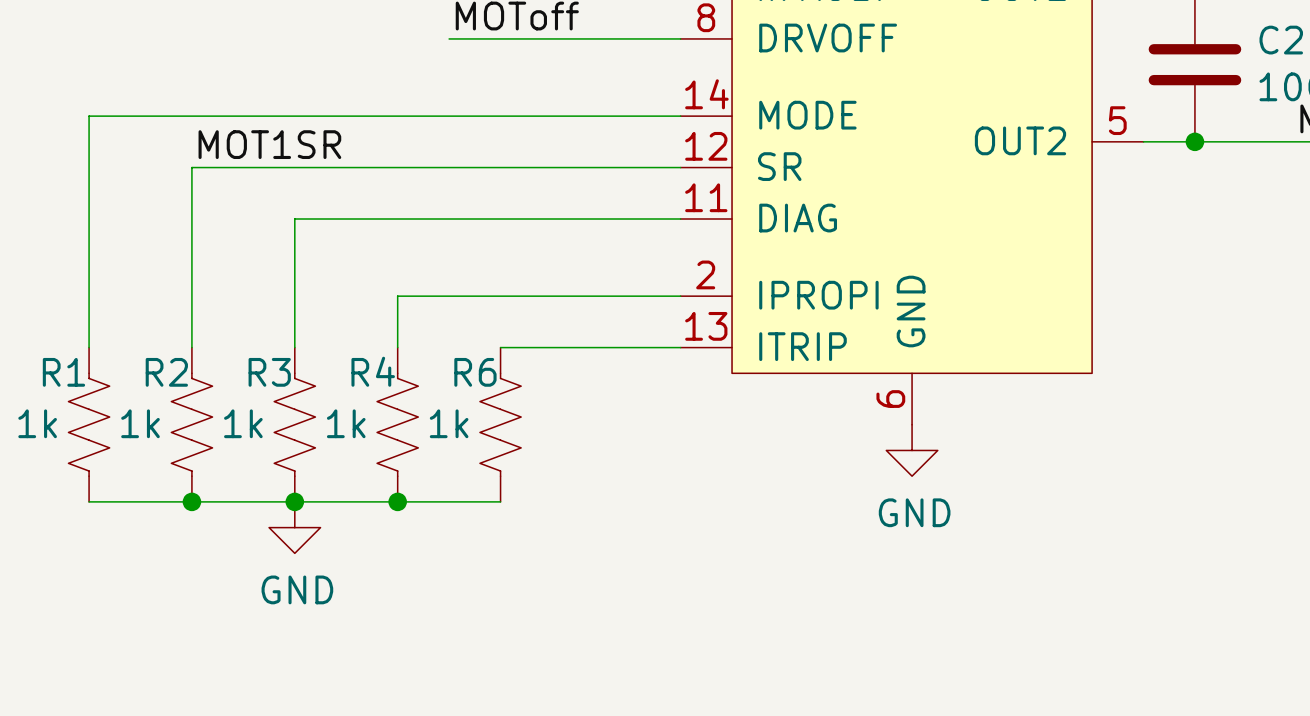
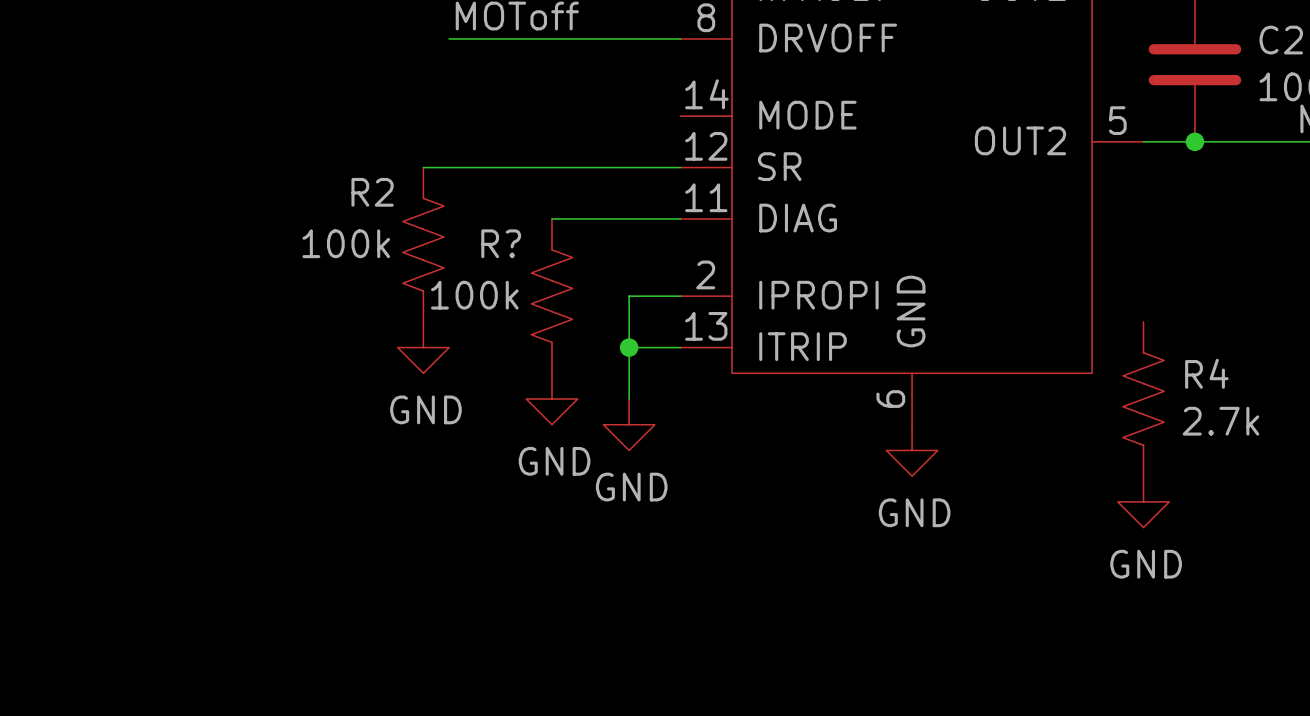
wire: (680, 116) (89, 116) (89, 347) -> none
label: MOT1SR (269, 144) -> none
wire: (423, 167) (191, 167) (191, 347) -> none
wire: (551, 219) (294, 219) (294, 347) -> none
R?: none -> 100k (551, 296)
wire: (629, 296) (397, 296) (397, 347) -> (629, 296) (629, 399)
power symbol: none -> GND (423, 347)
wire: (500, 347) (629, 347) -> none
junction: none -> (629, 347)
R4 name position: R4 (373, 371) -> R4 (1206, 373)
R2 name position: R2 (166, 372) -> R2 (372, 192)
power symbol: none -> GND (551, 399)
R2 value: 1k (140, 423) -> 100k (346, 243)
R4 value: 1k (346, 423) -> 2.7k (1220, 421)
R1: 1k (89, 424) -> none
R2 position: (191, 424) -> (423, 244)
R3: 1k (294, 424) -> none
R4 position: (397, 424) -> (1143, 399)
R6: 1k (500, 424) -> none
power symbol: none -> GND (629, 424)
wire: (89, 501) (500, 501) -> none
junction: (191, 501) -> none
junction: (294, 501) -> none
junction: (397, 501) -> none
power symbol: none -> GND (1143, 501)
power symbol: GND (294, 527) -> none

